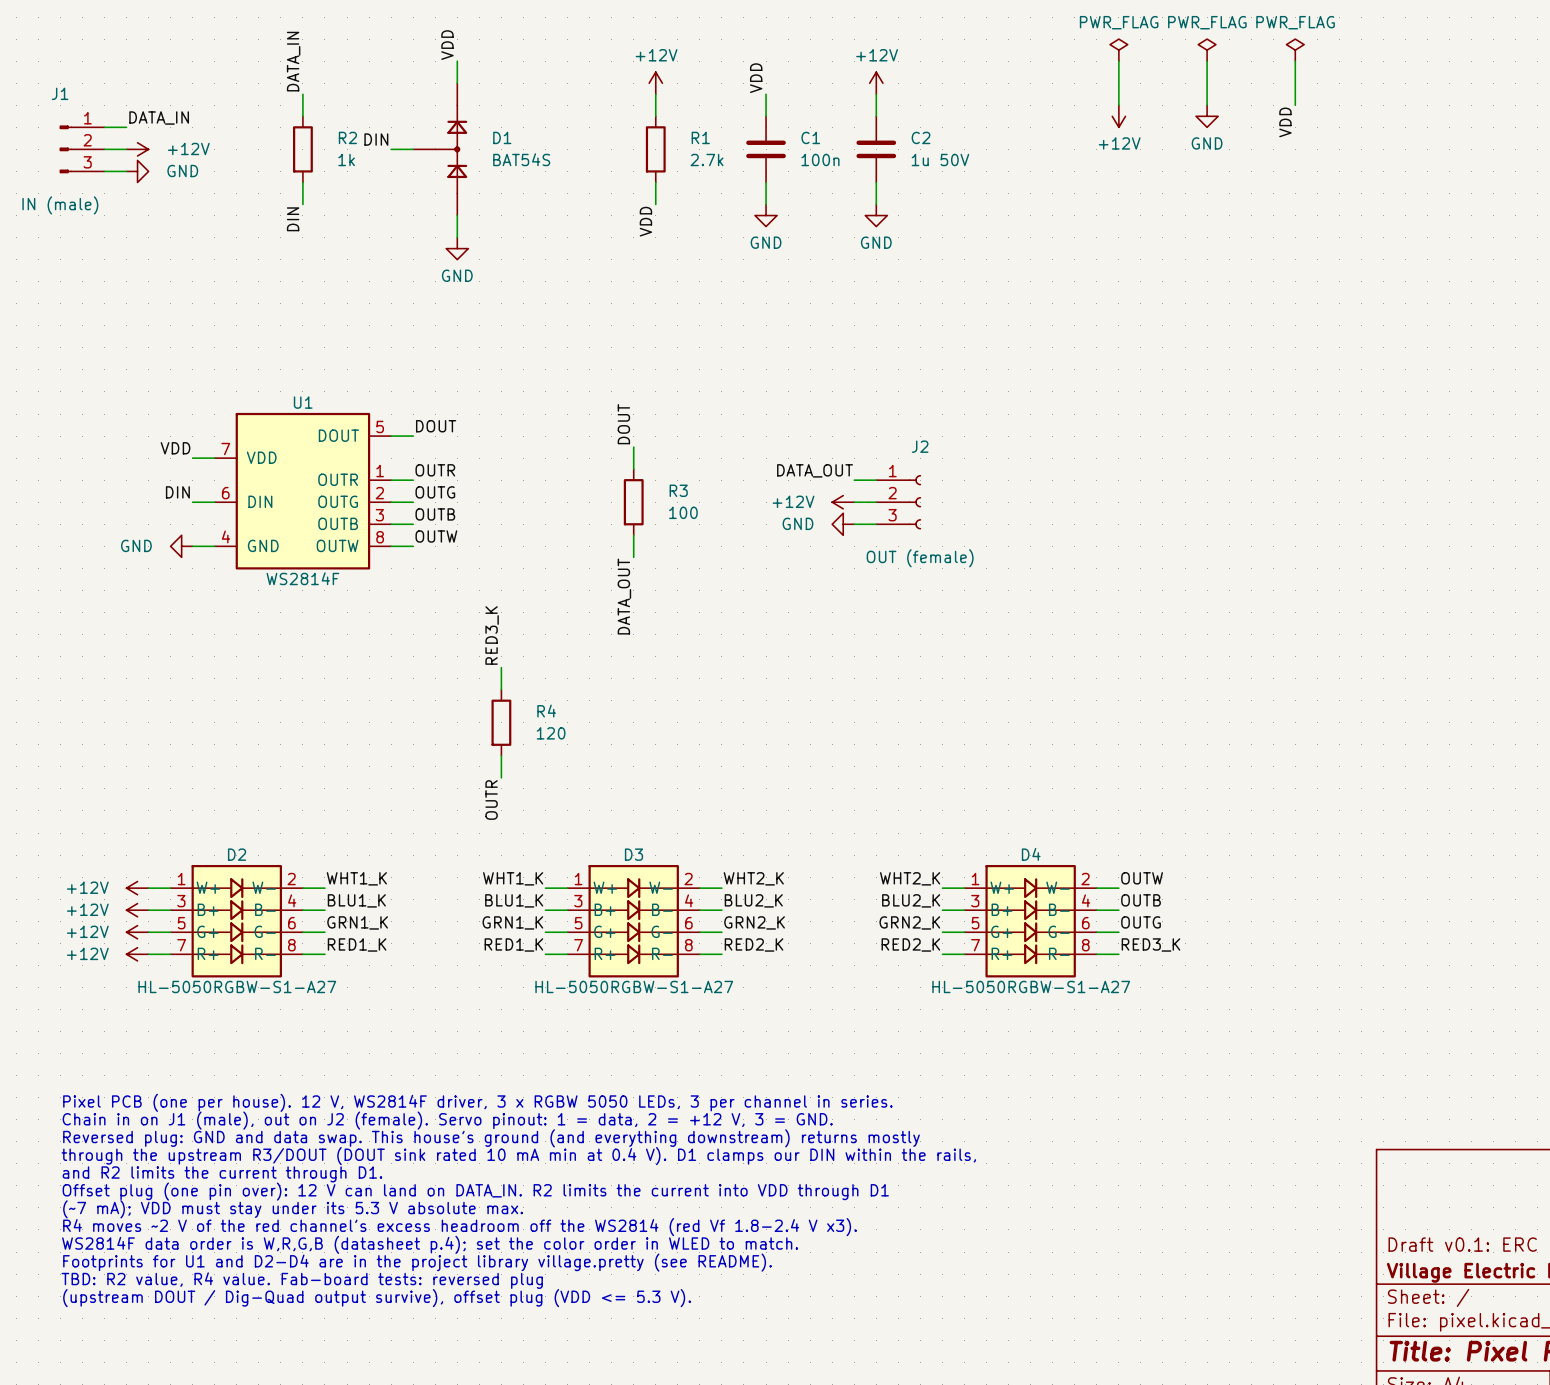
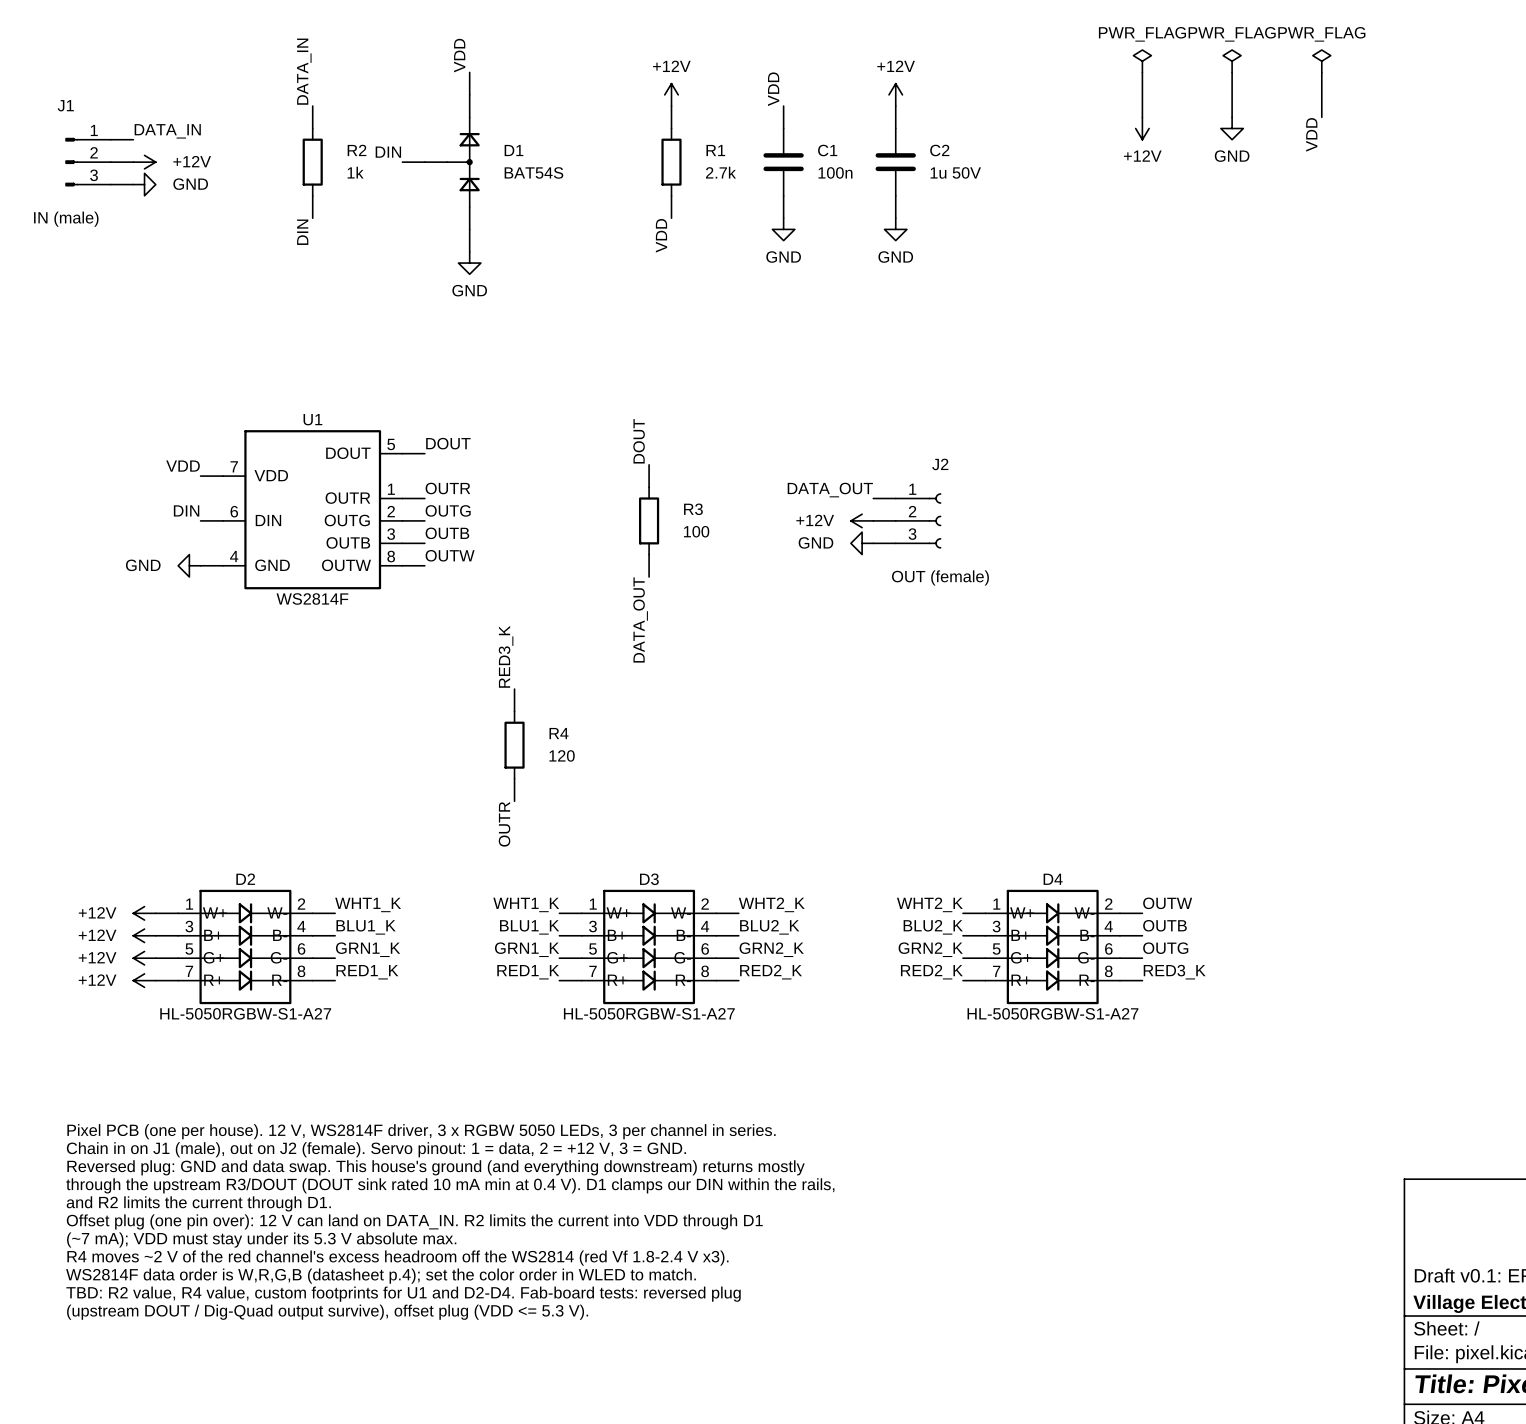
text: Footprints for U1 and D2-D4 are in the project library village.pretty (see README). (417, 1262) -> TBD: R2 value, R4 value, custom footprints for U1 and D2-D4. Fab-board tests: reversed plug (403, 1294)
text: TBD: R2 value, R4 value. Fab-board tests: reversed plug (302, 1280) -> (upstream DOUT / Dig-Quad output survive), offset plug (VDD <= 5.3 V). (327, 1312)
text: (upstream DOUT / Dig-Quad output survive), offset plug (VDD <= 5.3 V). (377, 1298) -> none

